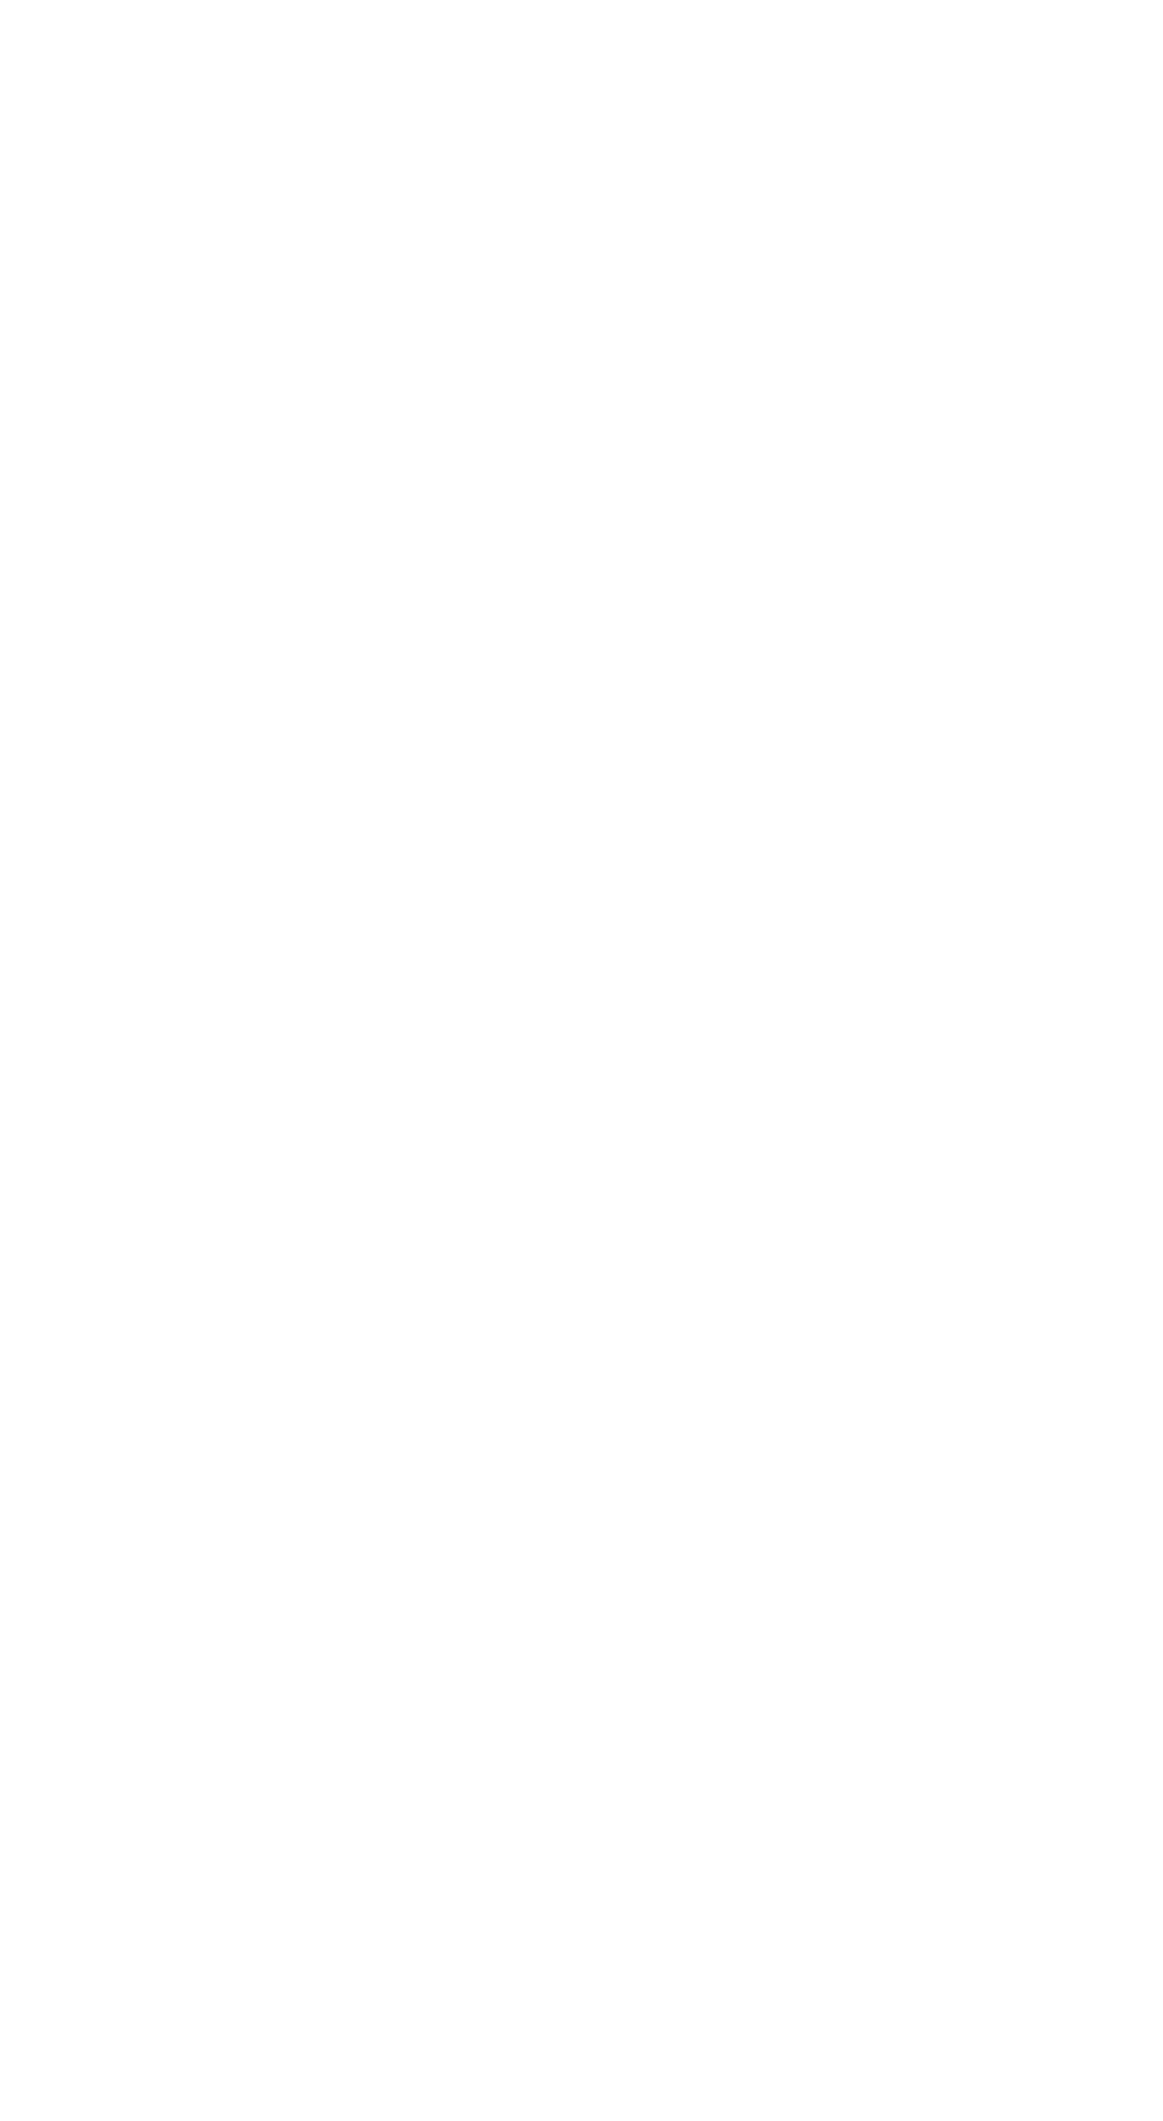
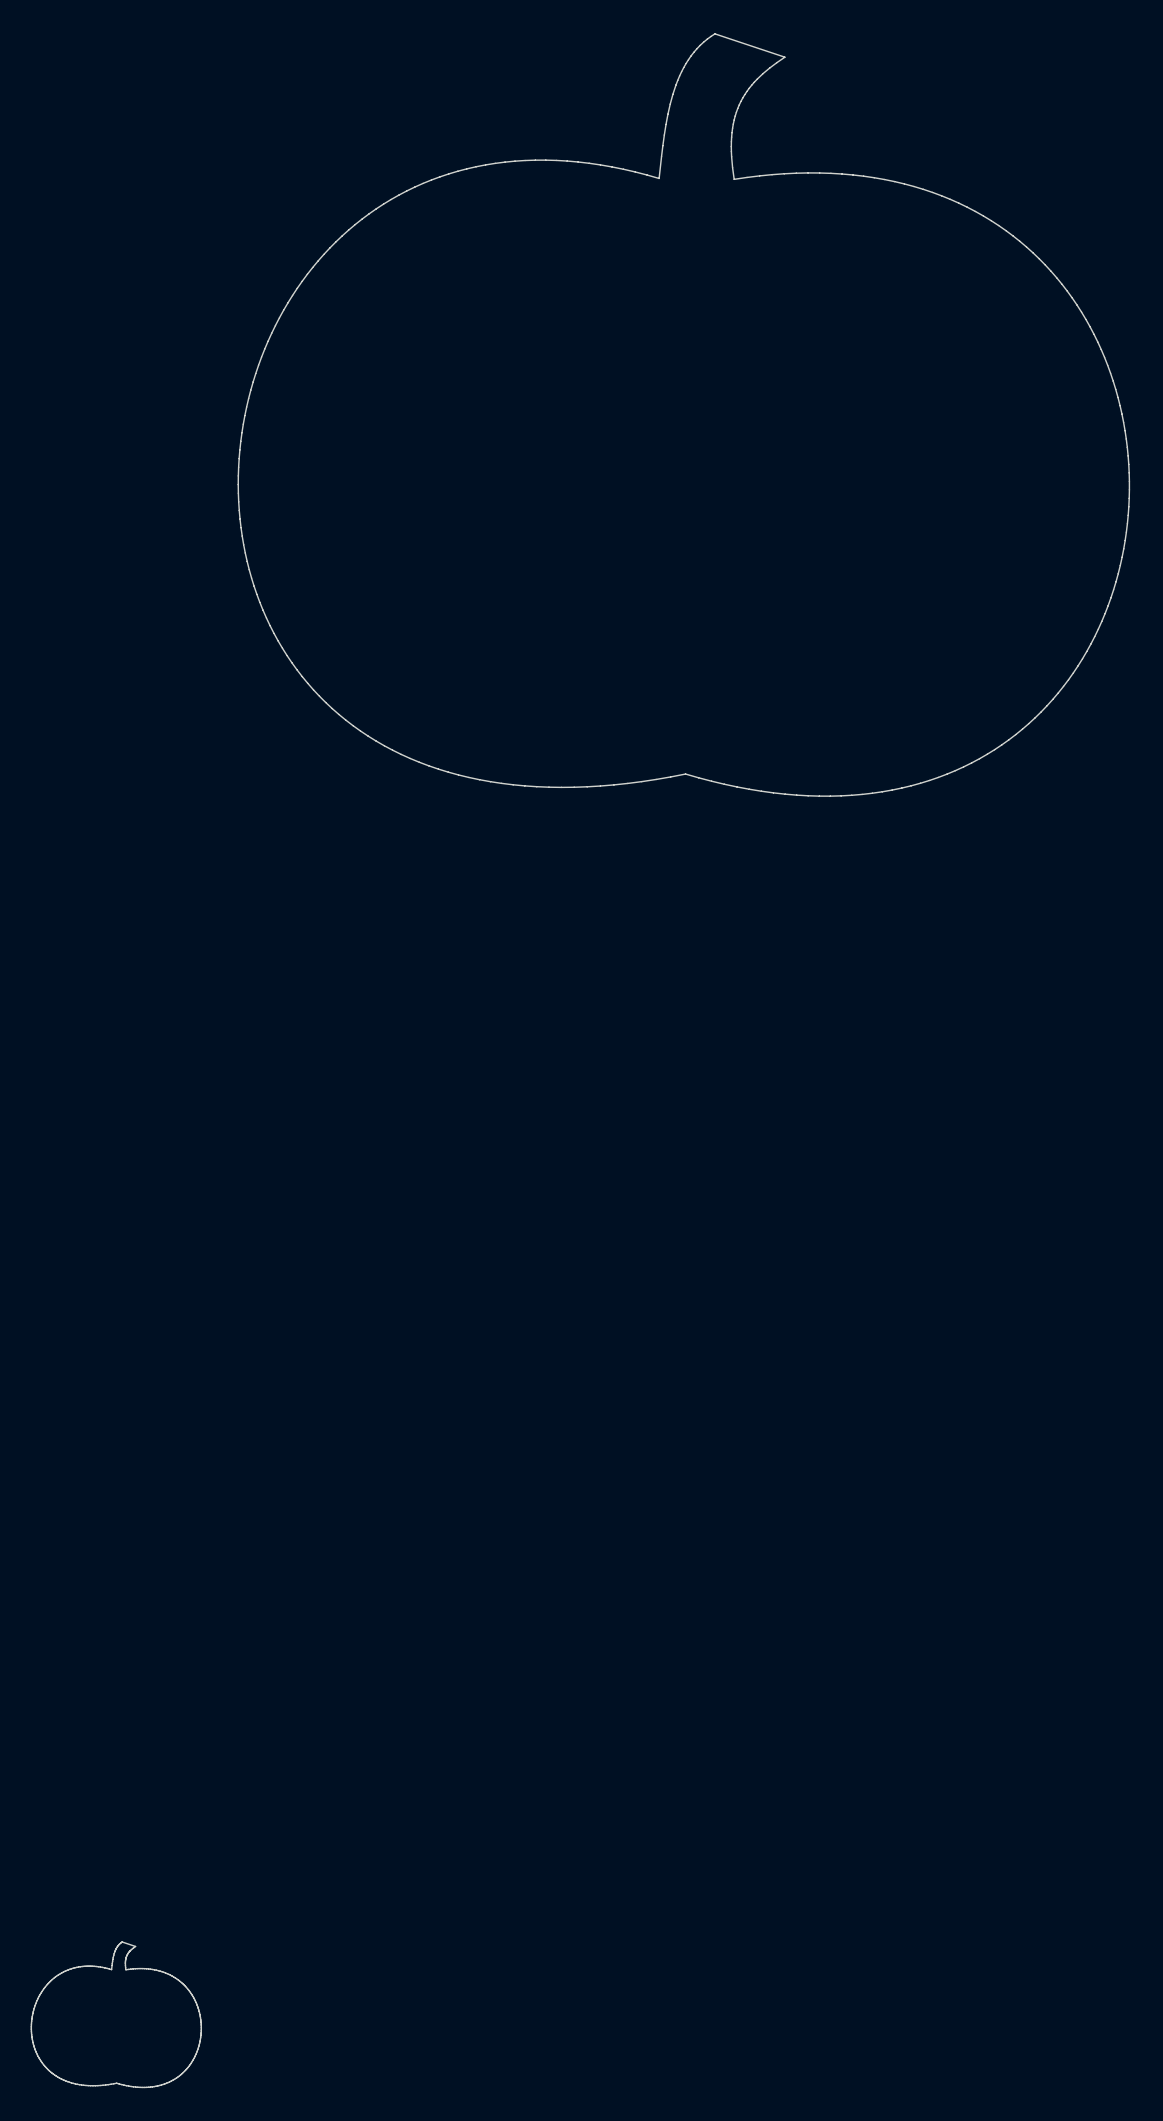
drawing: none -> [237, 33, 1130, 797]
drawing: none -> [30, 1941, 202, 2088]

